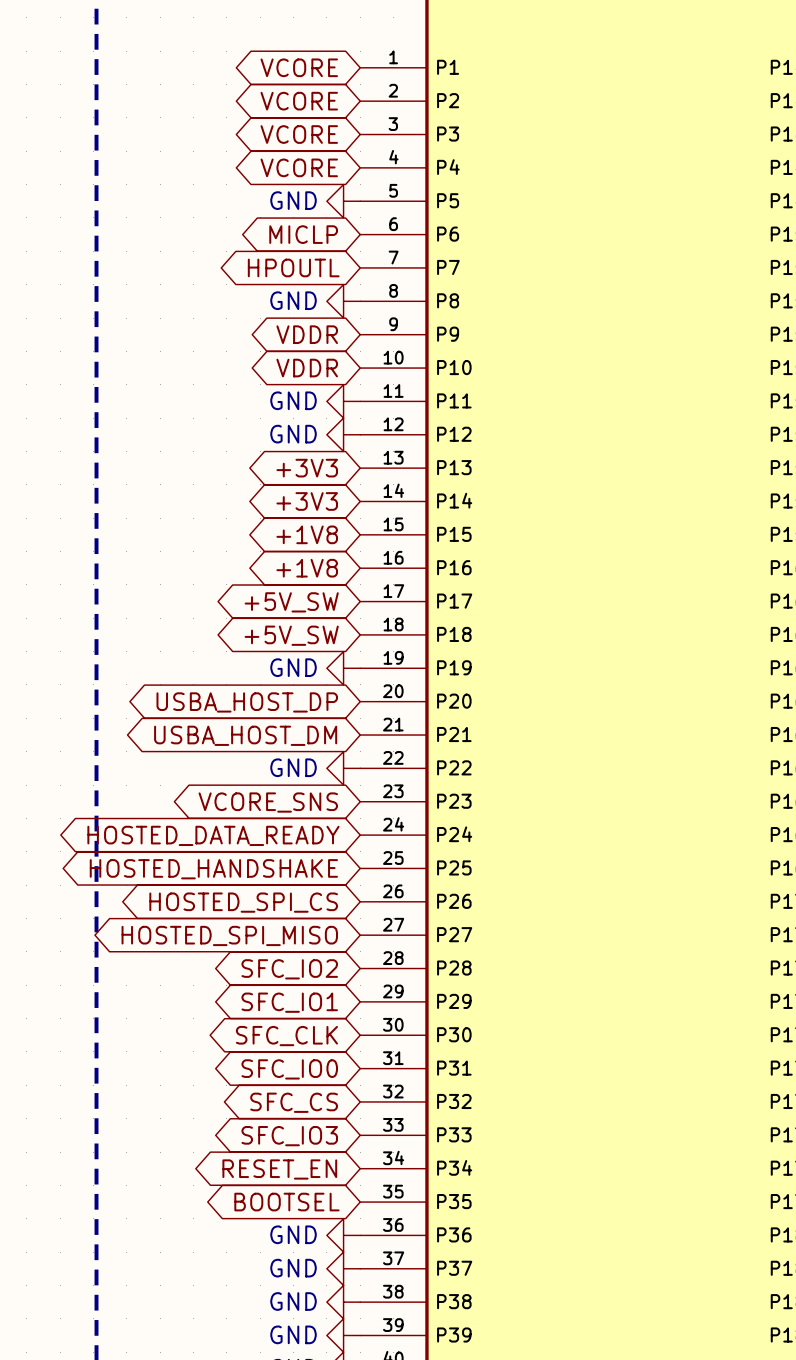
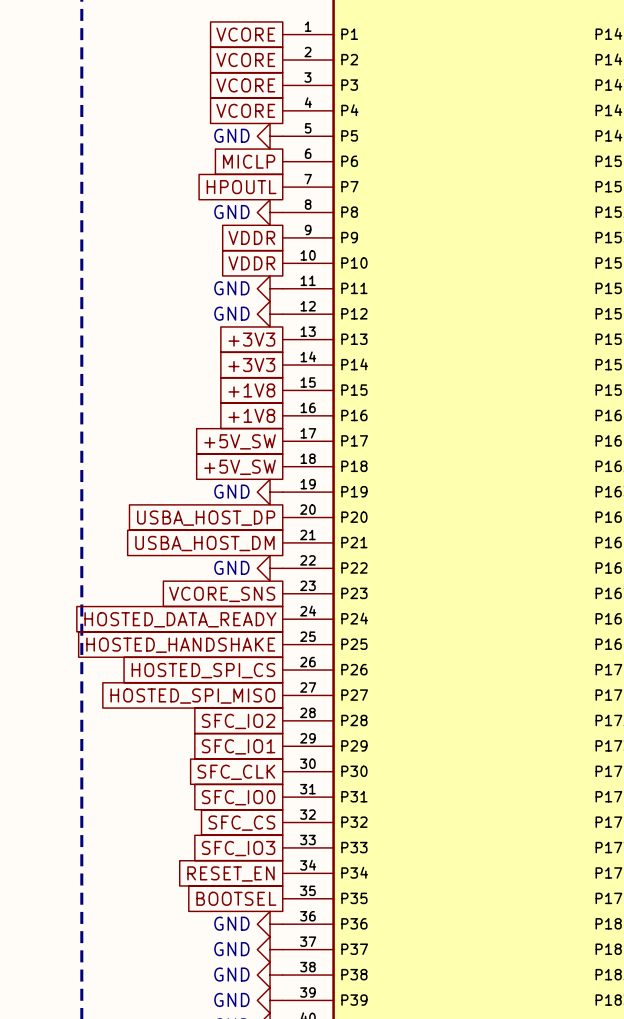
global label shape: bidirectional (299, 67) -> passive (245, 34)
global label shape: bidirectional (299, 101) -> passive (245, 60)
global label shape: bidirectional (299, 134) -> passive (245, 85)
global label shape: bidirectional (299, 167) -> passive (245, 110)
global label shape: bidirectional (303, 234) -> passive (249, 161)
global label shape: bidirectional (293, 267) -> passive (241, 187)
global label shape: bidirectional (307, 334) -> passive (251, 237)
global label shape: bidirectional (307, 368) -> passive (251, 263)
global label shape: bidirectional (307, 468) -> passive (251, 339)
global label shape: bidirectional (307, 501) -> passive (251, 365)
global label shape: bidirectional (307, 534) -> passive (251, 390)
global label shape: bidirectional (307, 568) -> passive (251, 415)
global label shape: bidirectional (291, 602) -> passive (240, 441)
global label shape: bidirectional (291, 635) -> passive (240, 467)
global label shape: bidirectional (247, 702) -> passive (206, 518)
global label shape: bidirectional (245, 735) -> passive (204, 543)
global label shape: bidirectional (268, 802) -> passive (222, 594)
global label shape: bidirectional (213, 835) -> passive (180, 619)
global label shape: bidirectional (213, 869) -> passive (180, 645)
global label shape: bidirectional (243, 902) -> passive (203, 670)
global label shape: bidirectional (229, 935) -> passive (192, 696)
global label shape: bidirectional (289, 969) -> passive (238, 721)
global label shape: bidirectional (289, 1002) -> passive (238, 746)
global label shape: bidirectional (286, 1036) -> passive (236, 772)
global label shape: bidirectional (289, 1069) -> passive (238, 797)
global label shape: bidirectional (294, 1102) -> passive (241, 823)
global label shape: bidirectional (289, 1136) -> passive (238, 848)
global label shape: bidirectional (279, 1169) -> passive (230, 873)
global label shape: bidirectional (286, 1202) -> passive (236, 898)

